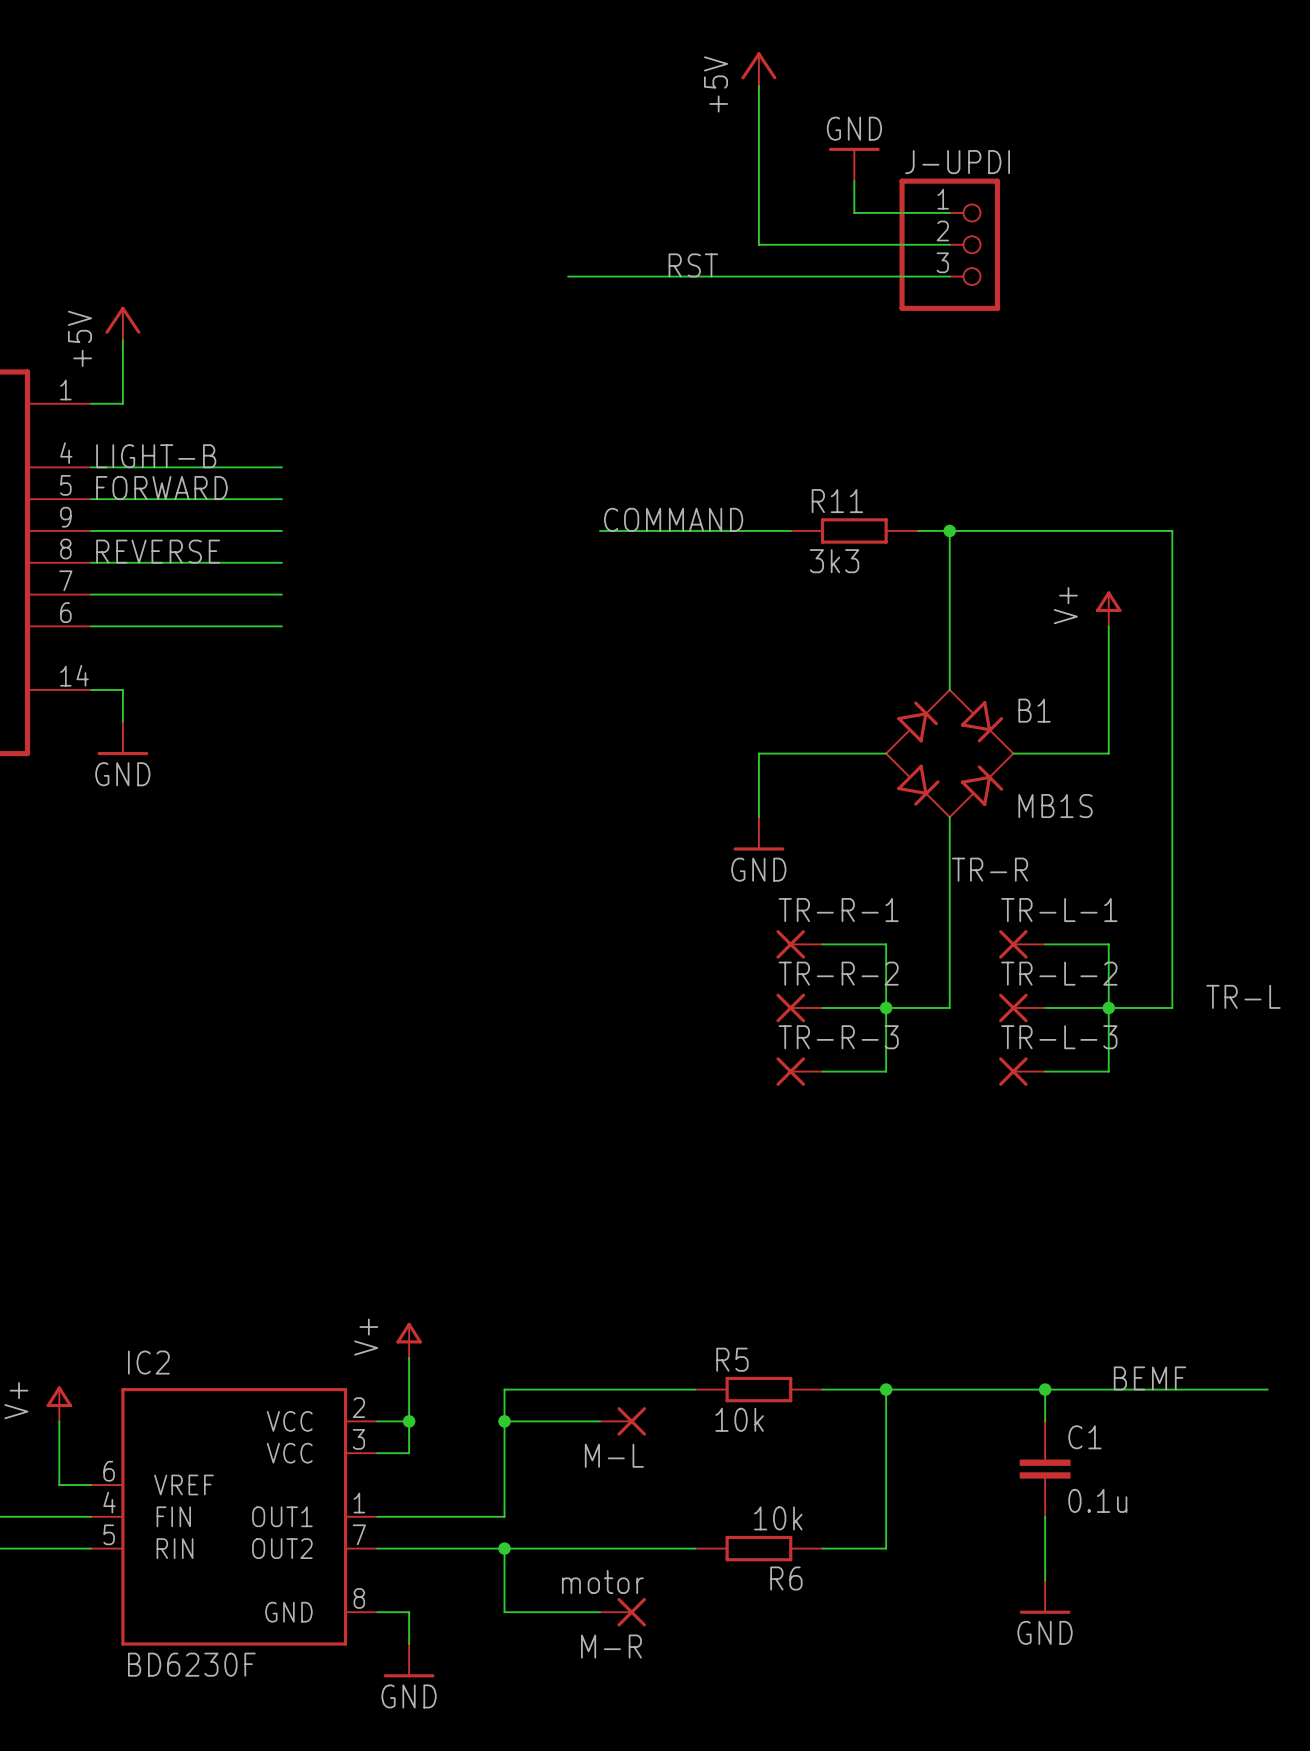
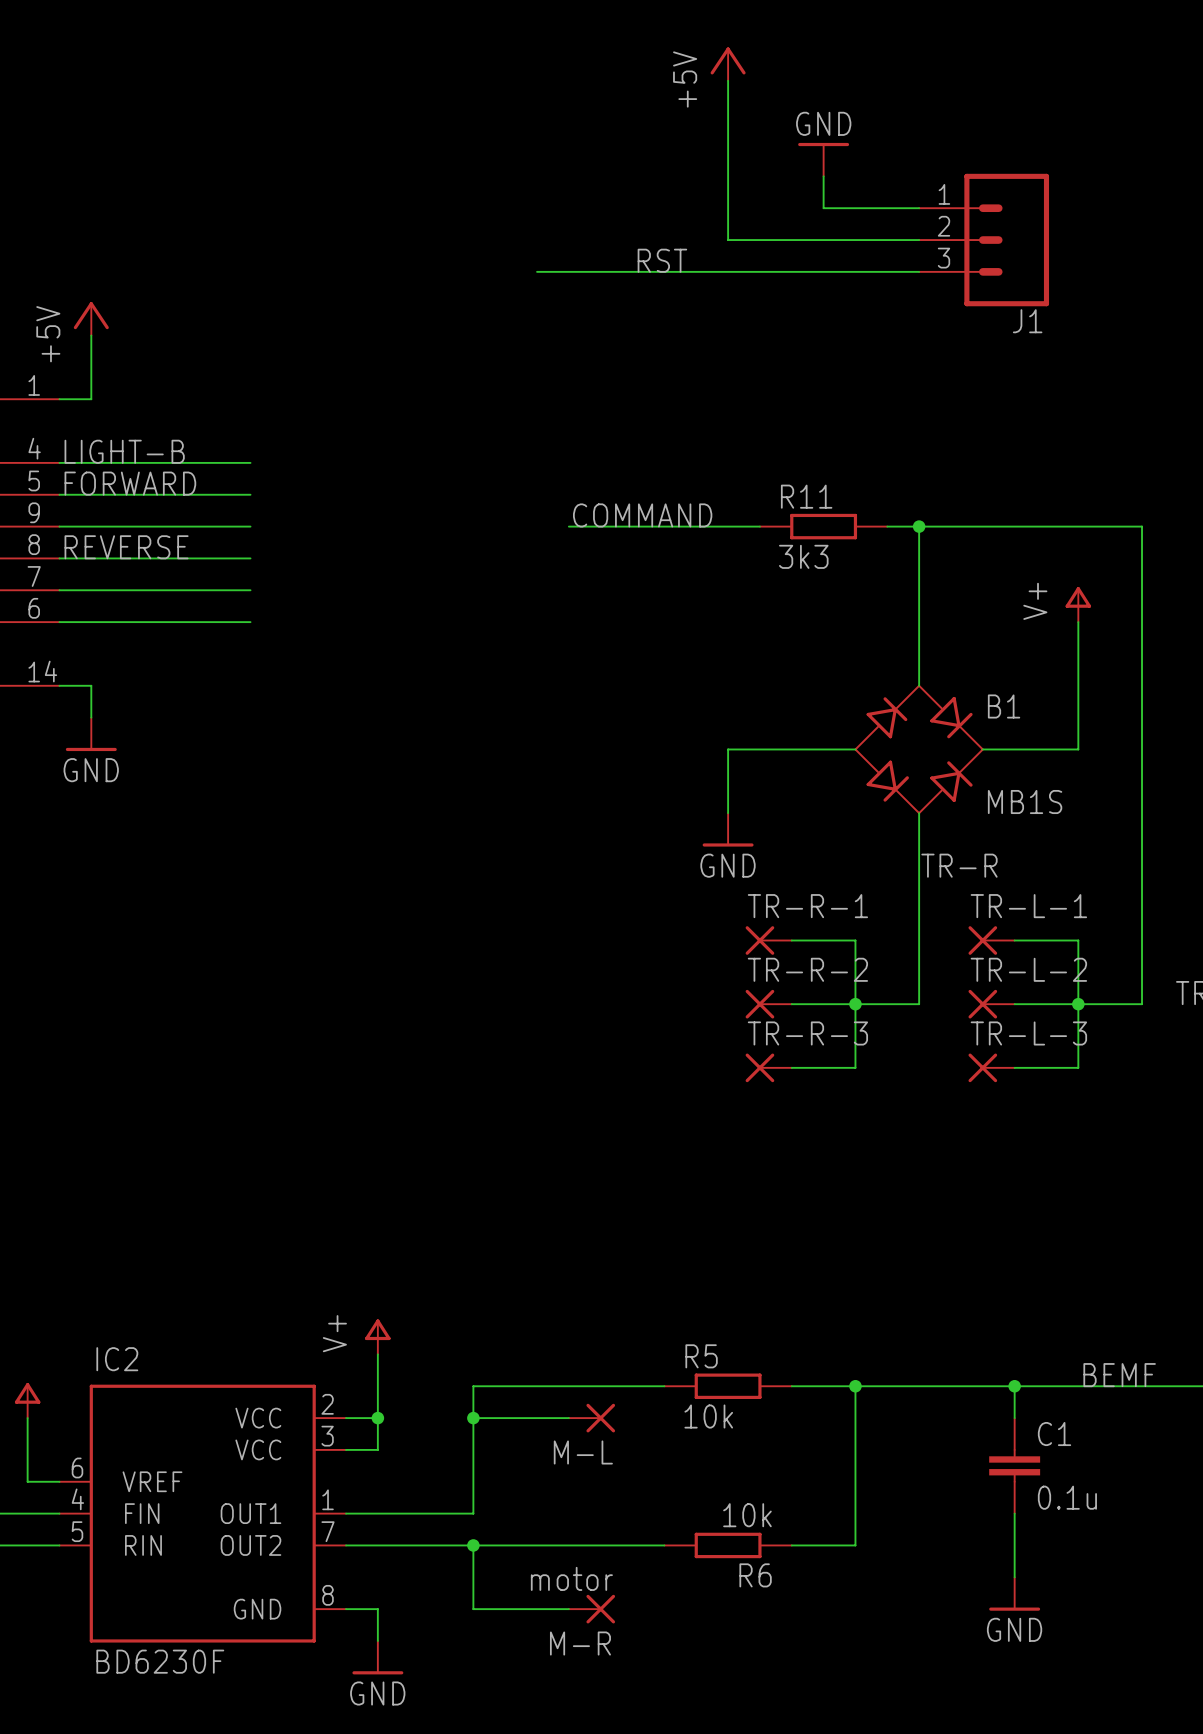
J-UPDI: (949, 244) -> none
J1: none -> (984, 240)

